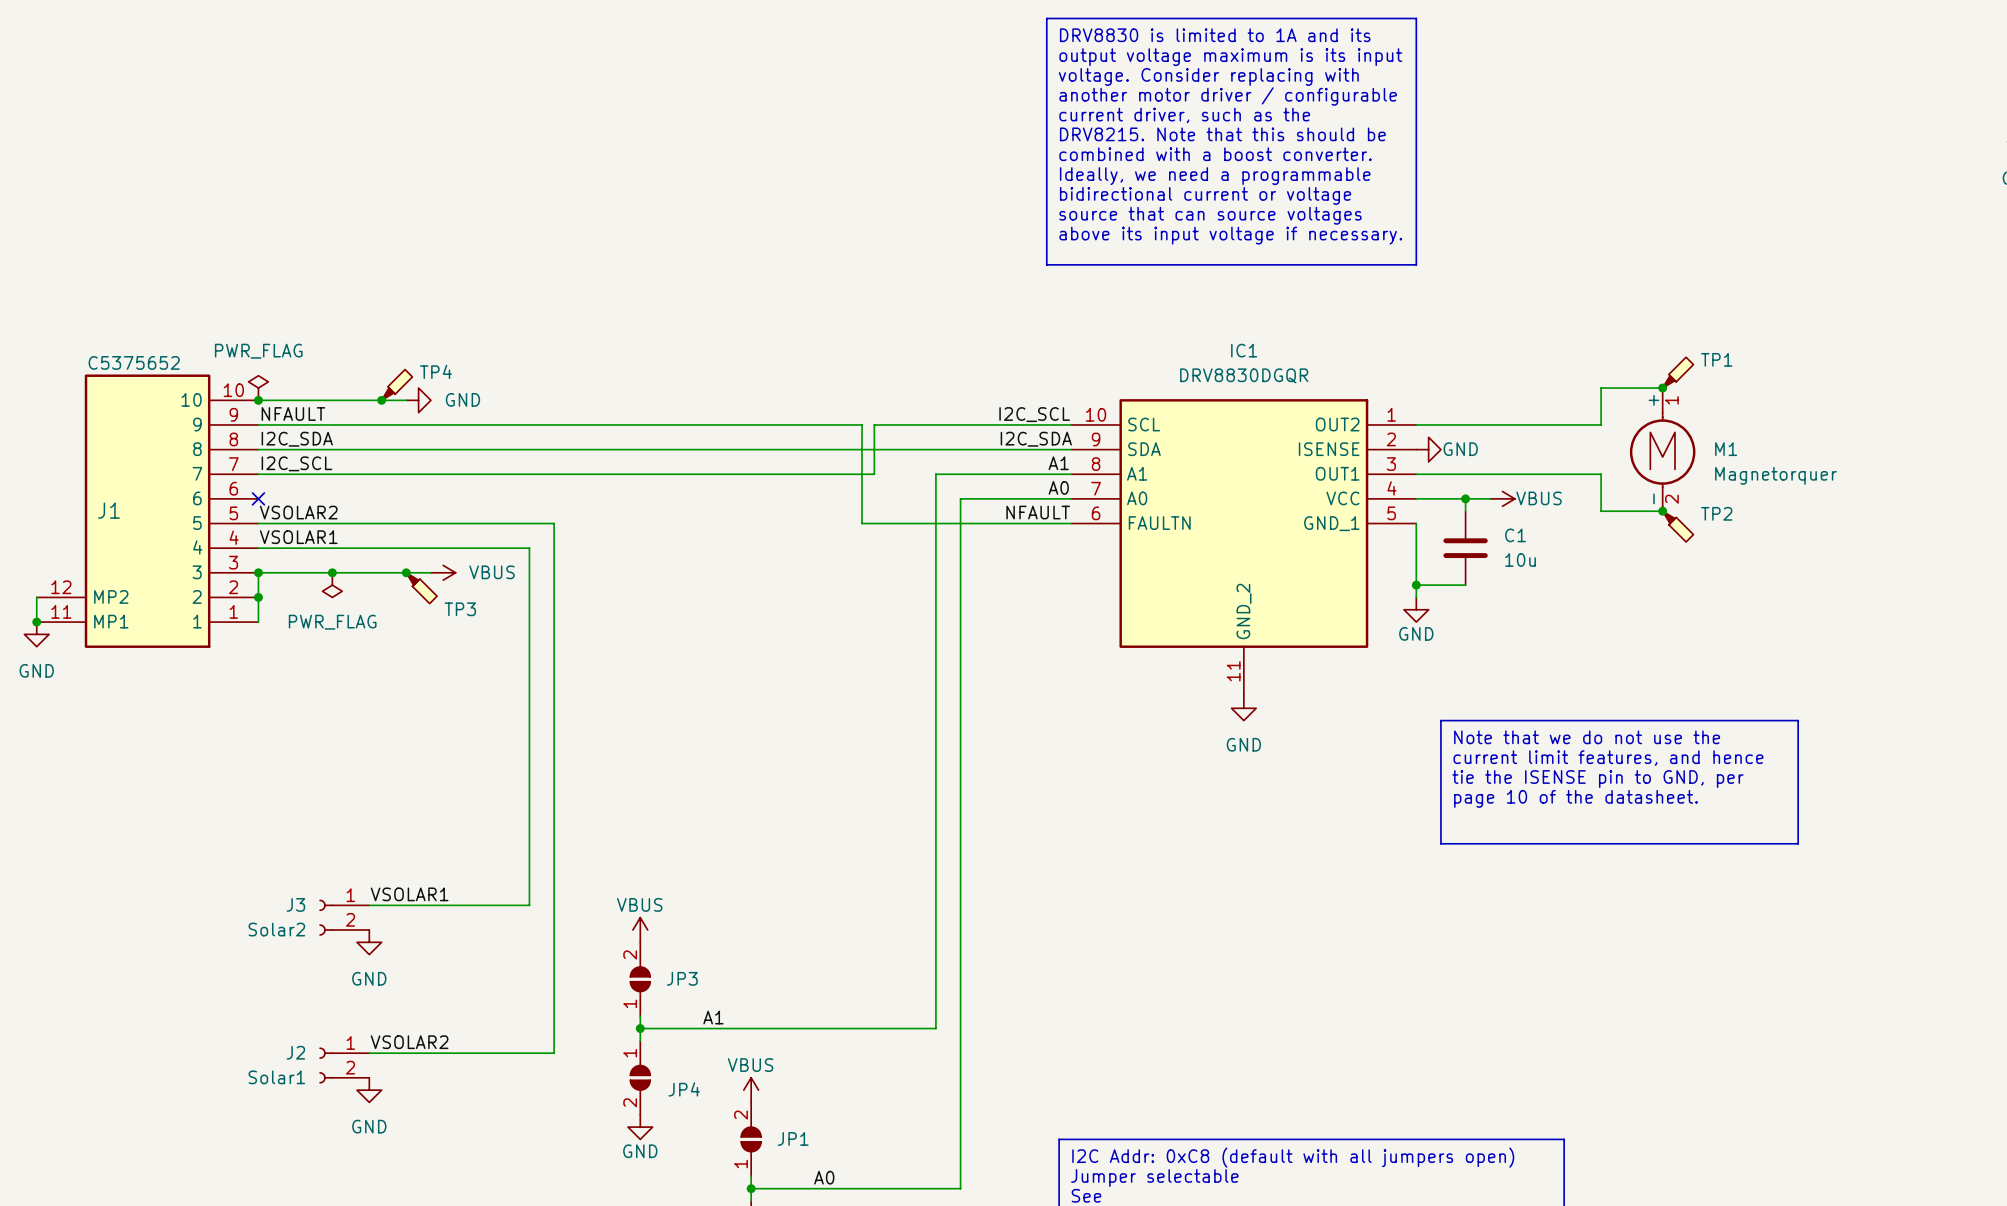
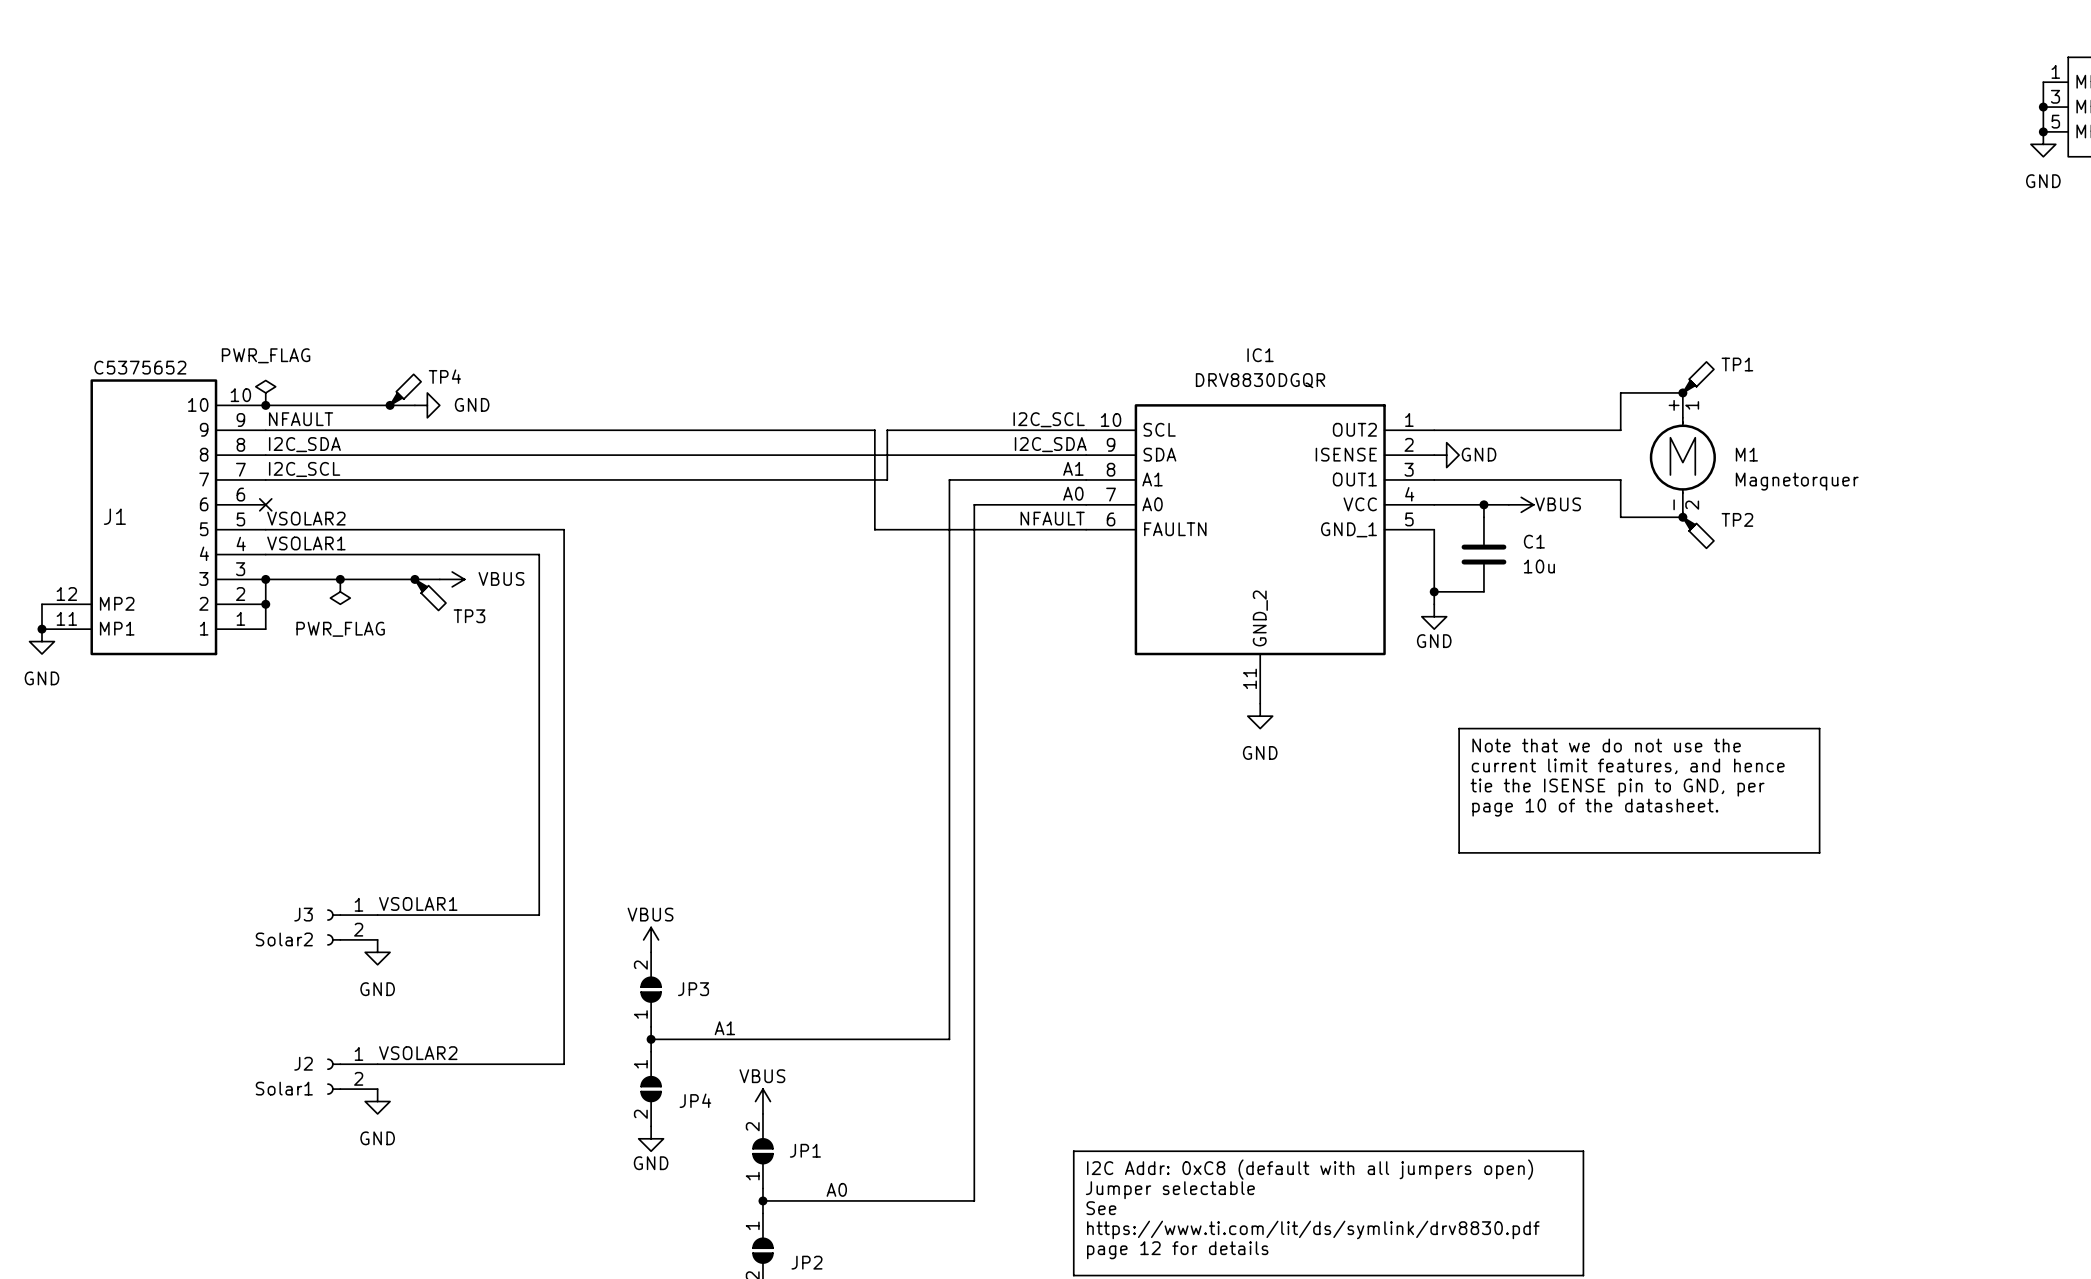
line: (1046, 18) (1416, 18) (1416, 264) (1046, 264) (1046, 18) -> none
text: DRV8830 is limited to 1A and its (1215, 35) -> none
text: output voltage maximum is its input (1230, 57) -> none
text: voltage. Consider replacing with (1208, 76) -> none
text: another motor driver / configurable (1228, 96) -> none
text: current driver, such as the (1184, 115) -> none
text: DRV8215. Note that this should be (1222, 134) -> none
text: combined with a boost converter. (1215, 154) -> none
text: Ideally, we need a programmable (1215, 176) -> none
text: bidirectional current or voltage (1205, 195) -> none
text: source that can source voltages (1210, 215) -> none
text: above its input voltage if necessary. (1230, 235) -> none

